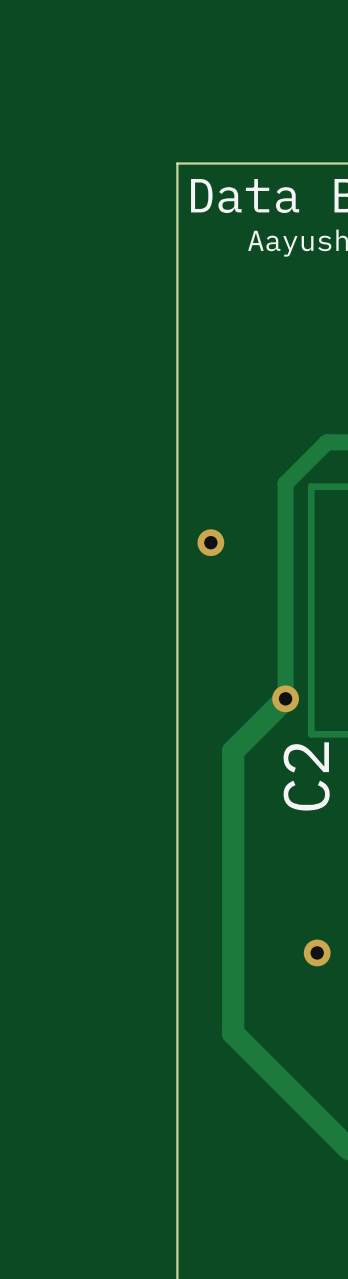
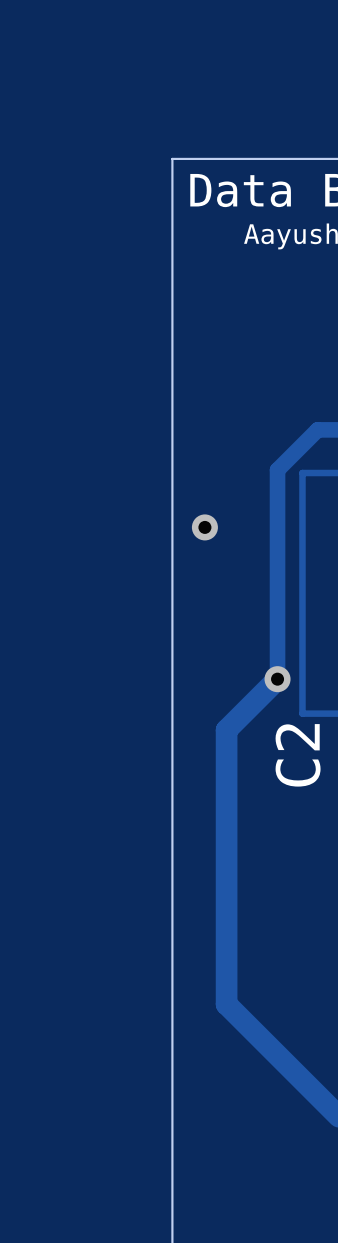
via: (317, 952) -> none

